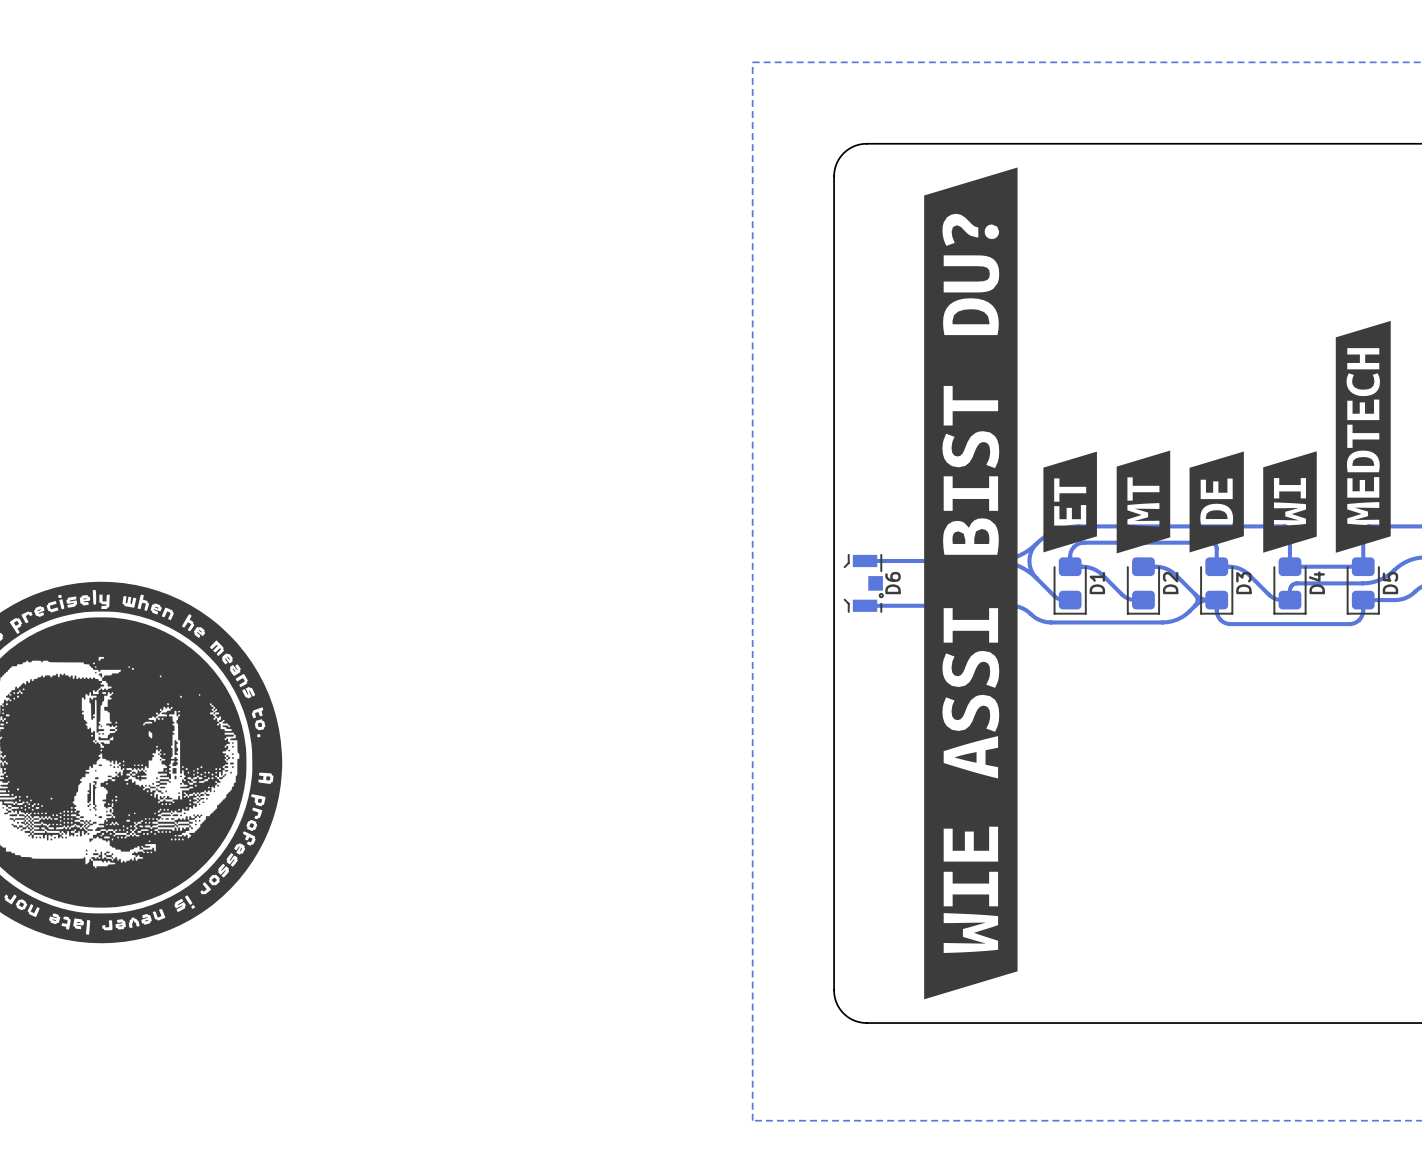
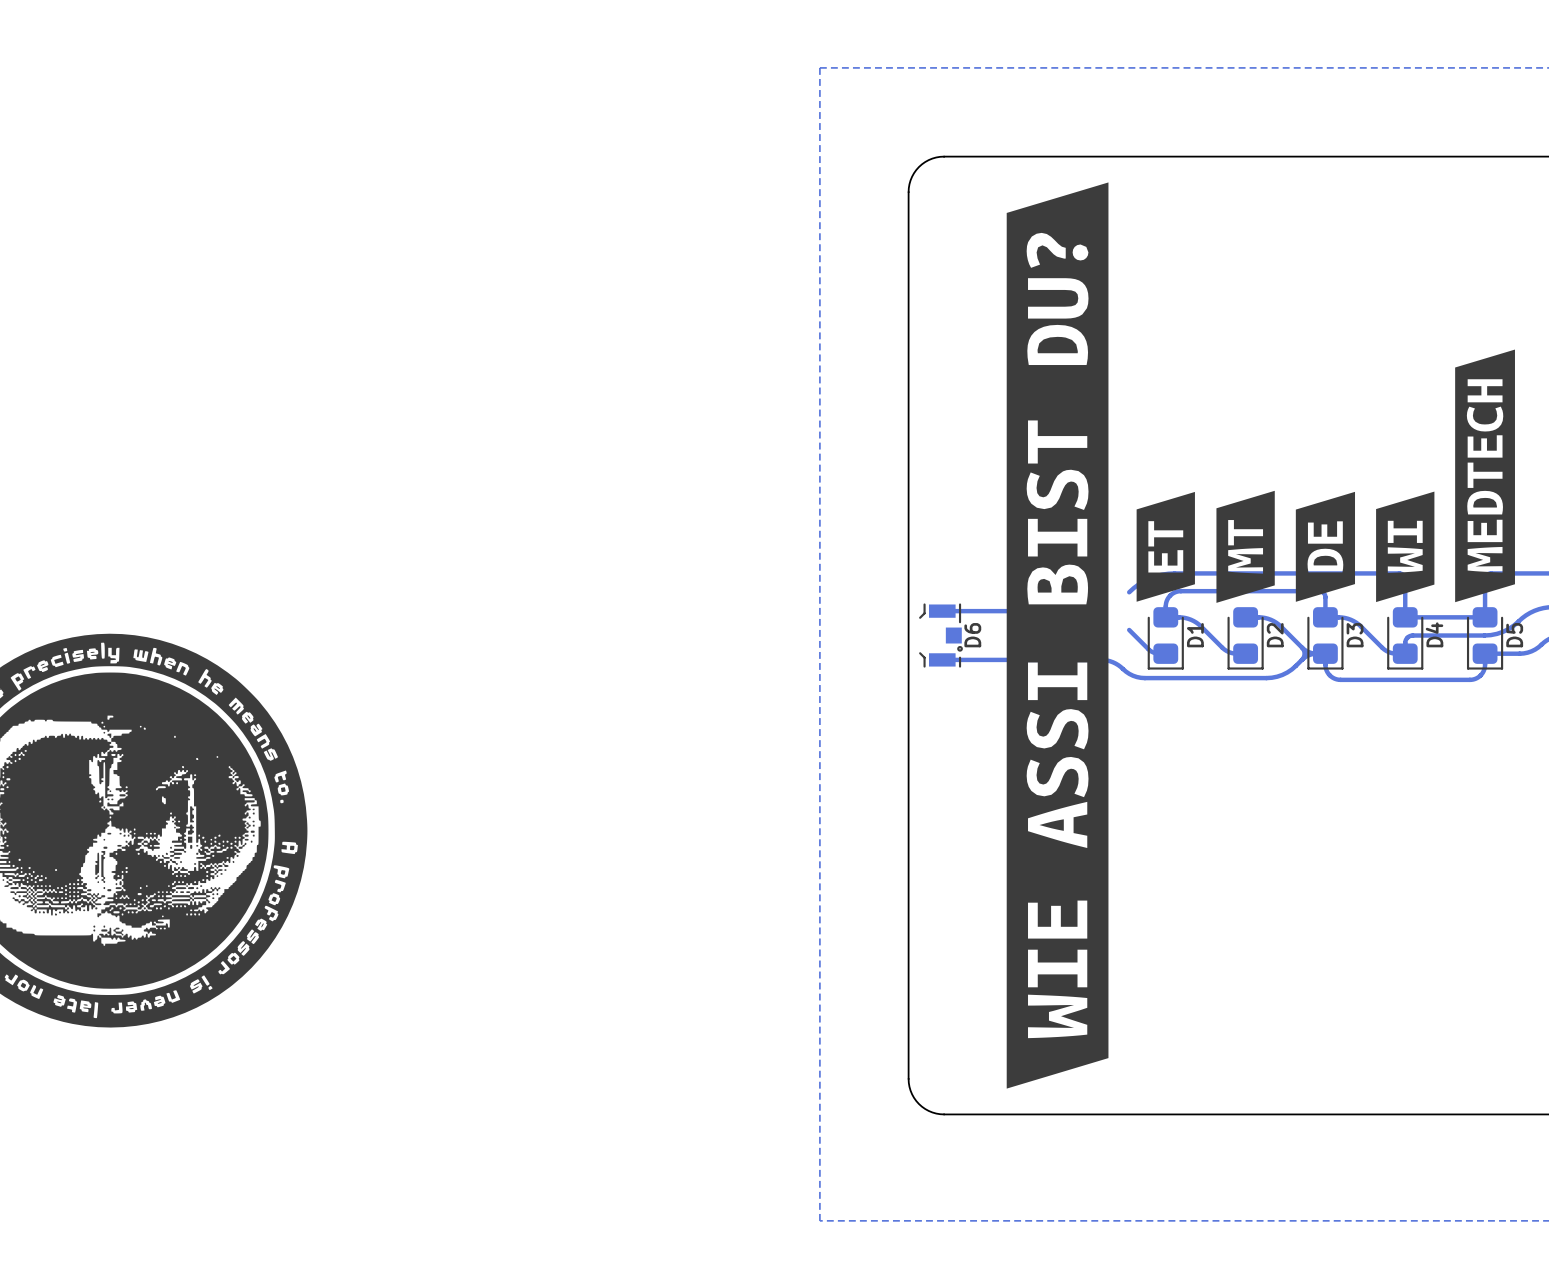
track: (1036, 543) (1031, 551) (1029, 561) (1031, 570) (1036, 578) (1017, 565) (994, 561) (1017, 556) (1036, 543) -> none

